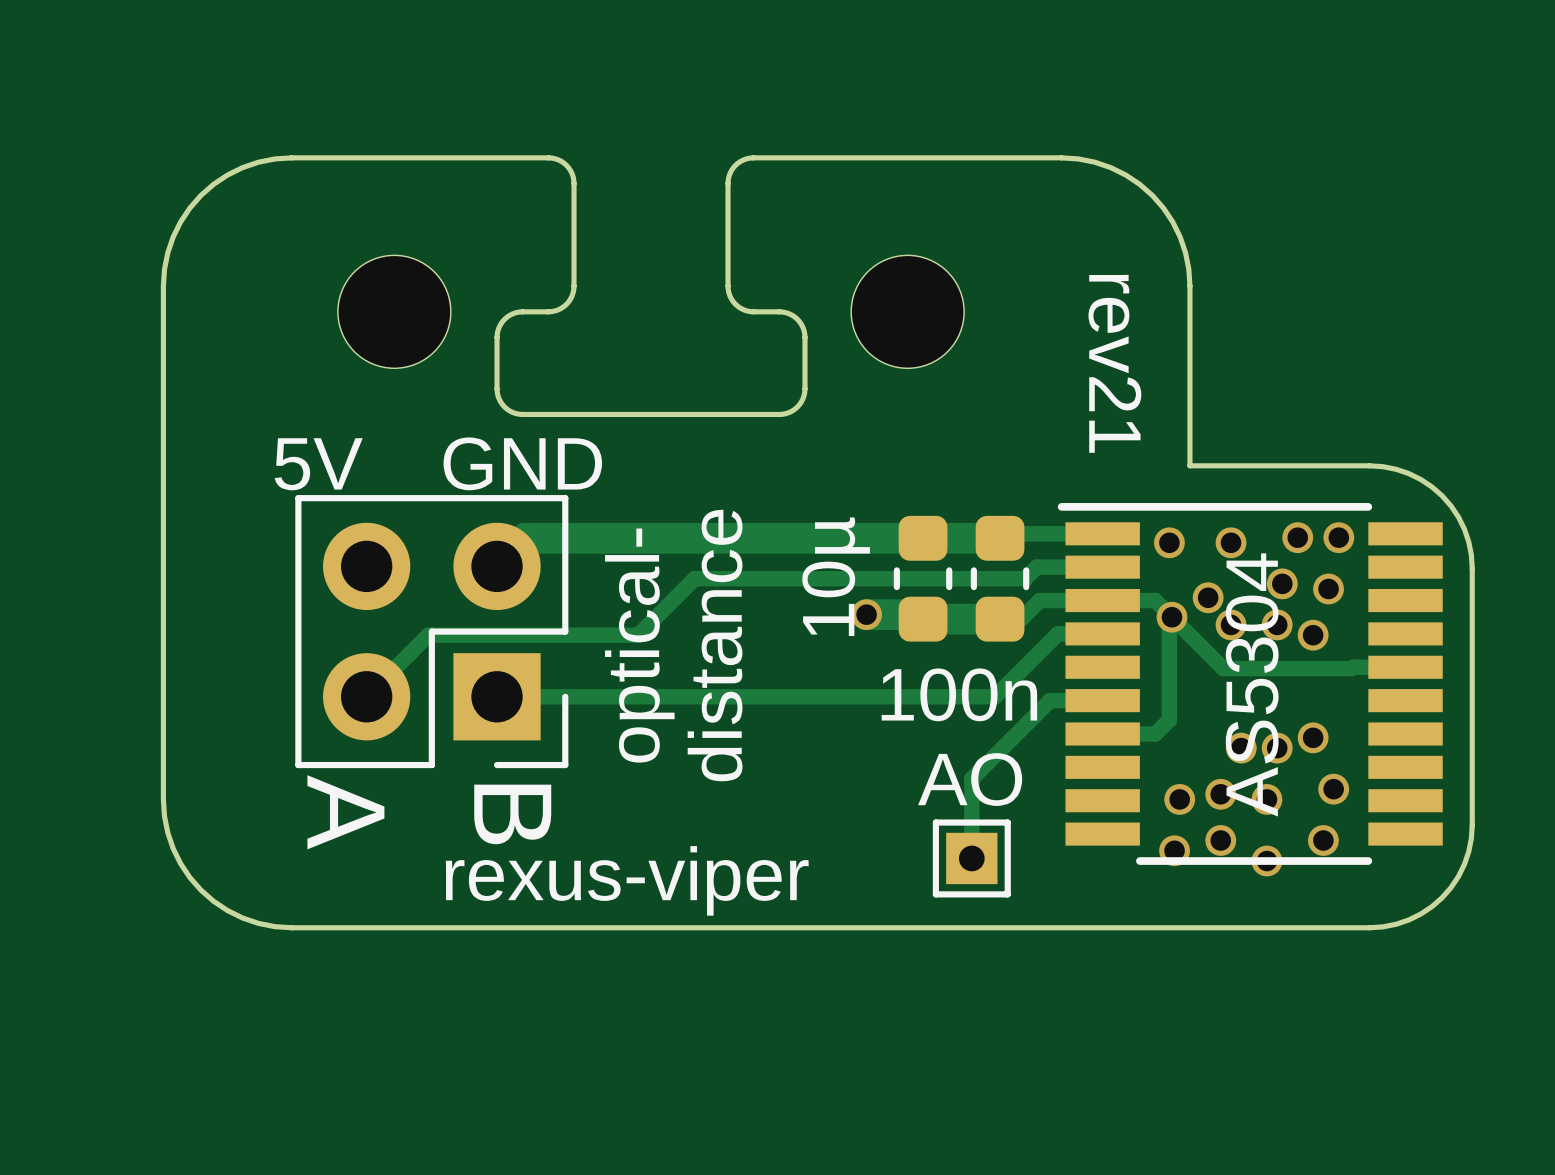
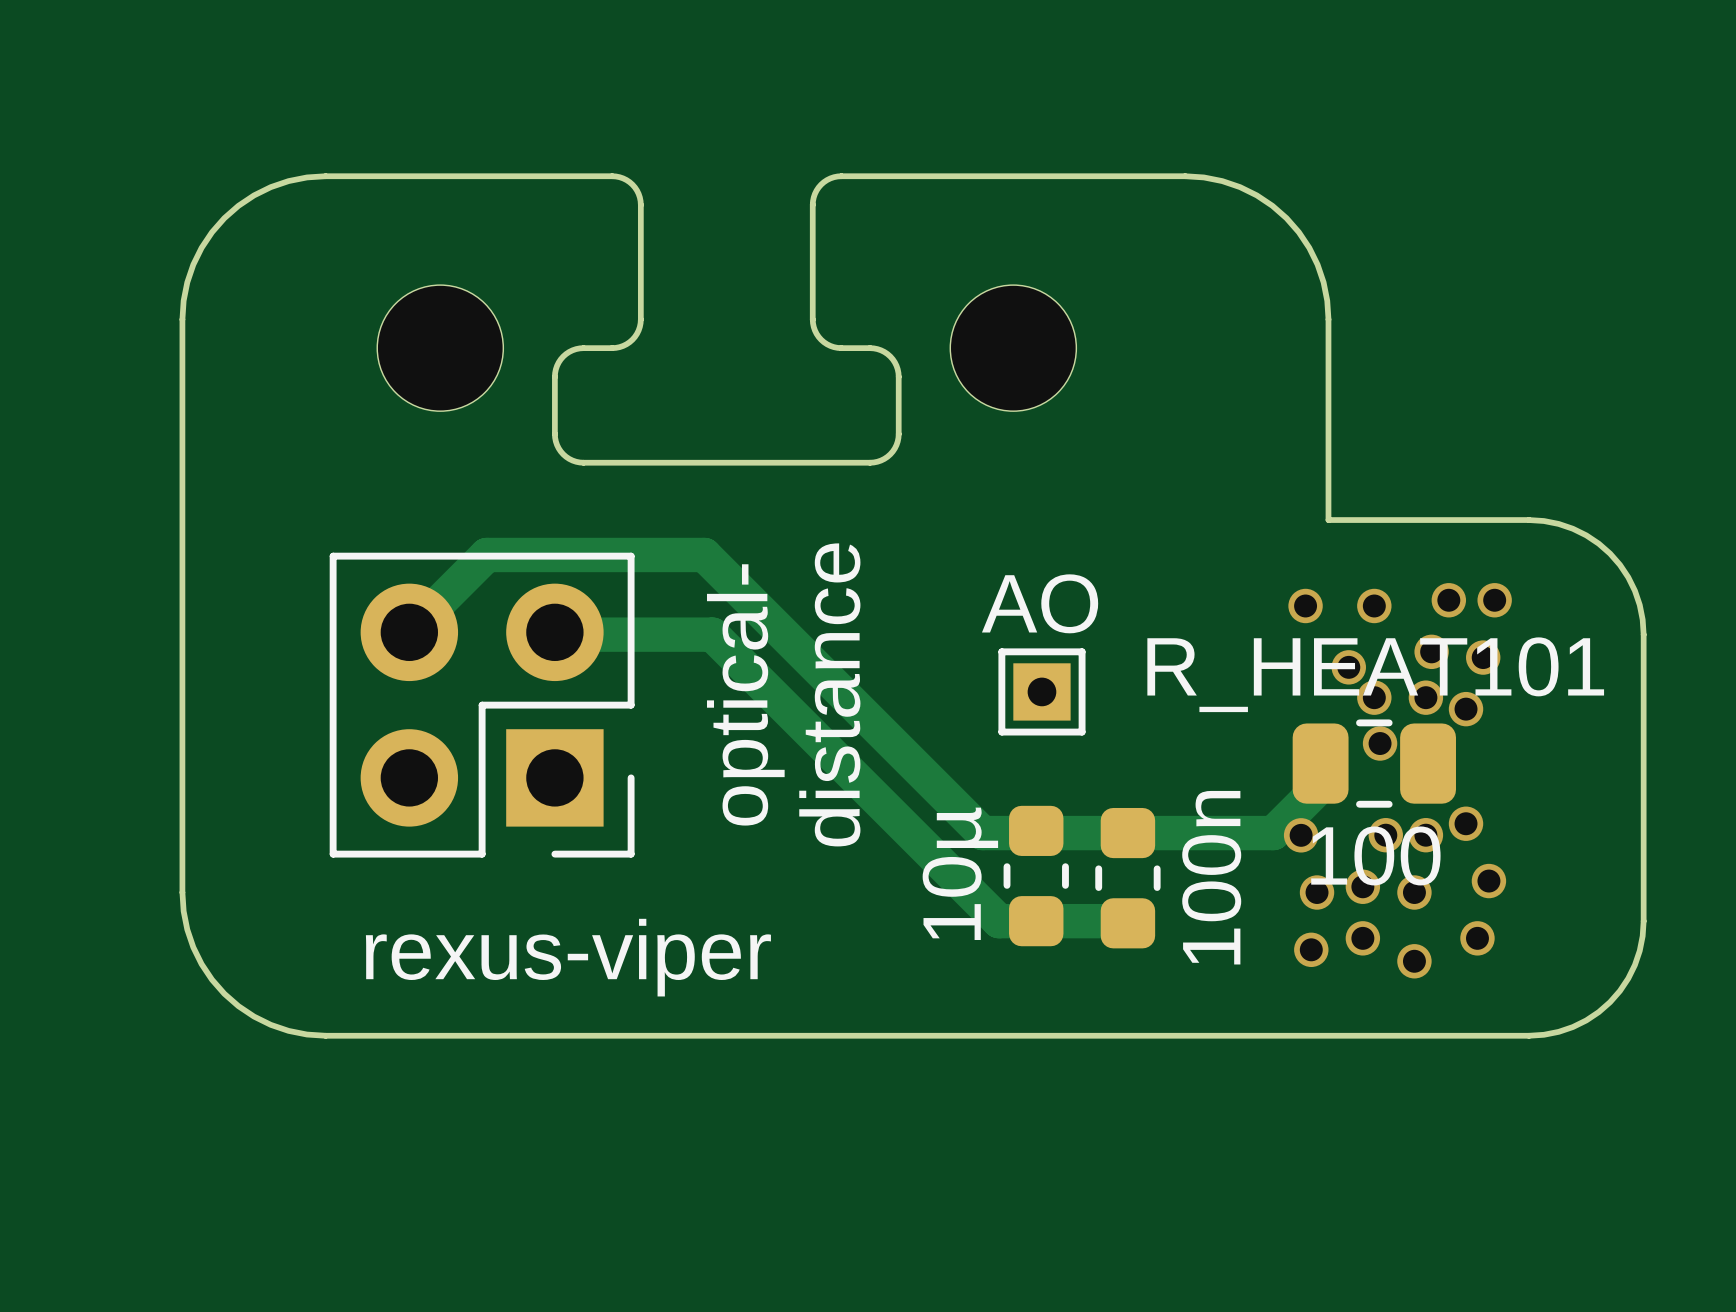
text: rev21 (1114, 363) -> none
text: GND (522, 463) -> none
text: 5V (318, 464) -> none
track: (1102, 533) (1004, 533) (1000, 538) (525, 538) (497, 566) -> (1127, 923) (1125, 921) (998, 921) (712, 634) (557, 634) (554, 632)
track: none -> (409, 632) (486, 554) (704, 554) (982, 833) (1273, 833) (1320, 785) (1320, 763)
track: (1102, 567) (1036, 567) (1025, 578) (694, 578) (638, 635) (428, 635) (366, 696) -> none
part value position: 10µ (836, 576) -> 10µ (960, 873)
part position: (923, 578) -> (1036, 876)
part position: (1000, 578) -> (1127, 878)
track: (866, 614) (918, 614) (923, 619) (1021, 619) (1039, 600) (1155, 600) (1223, 668) (1405, 667) -> none
via: (866, 614) -> none
track: (1169, 614) (1169, 719) (1155, 733) (1102, 733) -> none
via: (1171, 617) -> none
track: (1102, 633) (1057, 633) (995, 696) (497, 696) -> none
text position: optical- (639, 645) -> optical- (745, 694)
text position: distance (715, 645) -> distance (829, 694)
via: none -> (1380, 743)
R_HEAT101: none -> 100 (1374, 763)
part: AS5304 (1250, 683) -> none
part value rotation: 0° (959, 694) -> 90° counterclockwise (1211, 877)
track: (1102, 700) (1050, 700) (971, 778) (971, 858) -> none
via: none -> (1301, 835)
text: A (345, 812) -> none
text: B (512, 814) -> none
part position: (971, 858) -> (1041, 691)
text position: rexus-viper (627, 880) -> rexus-viper (568, 957)

